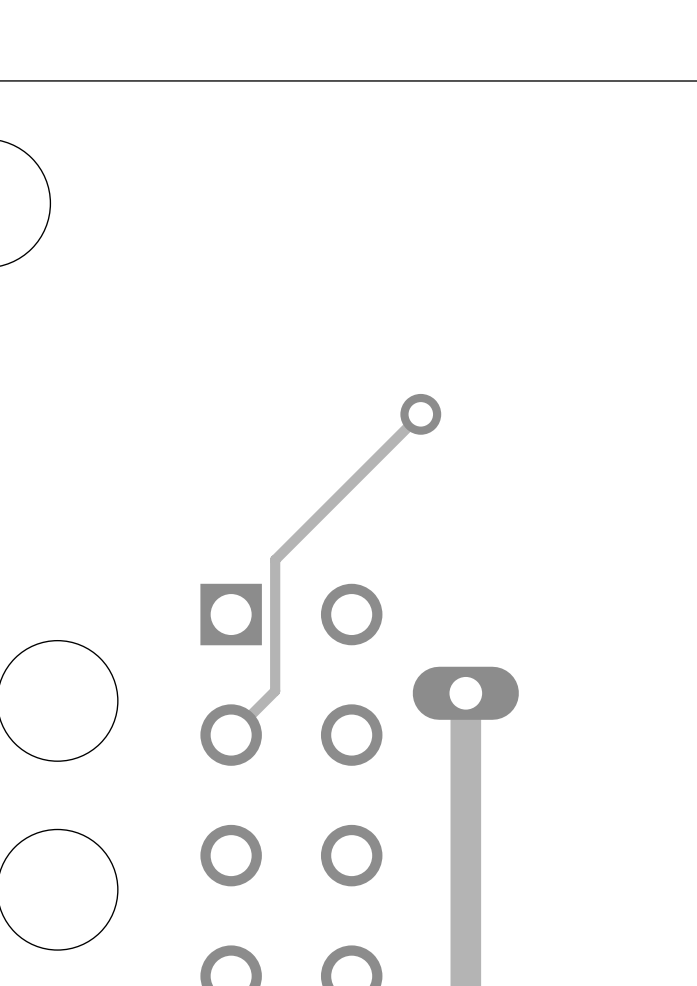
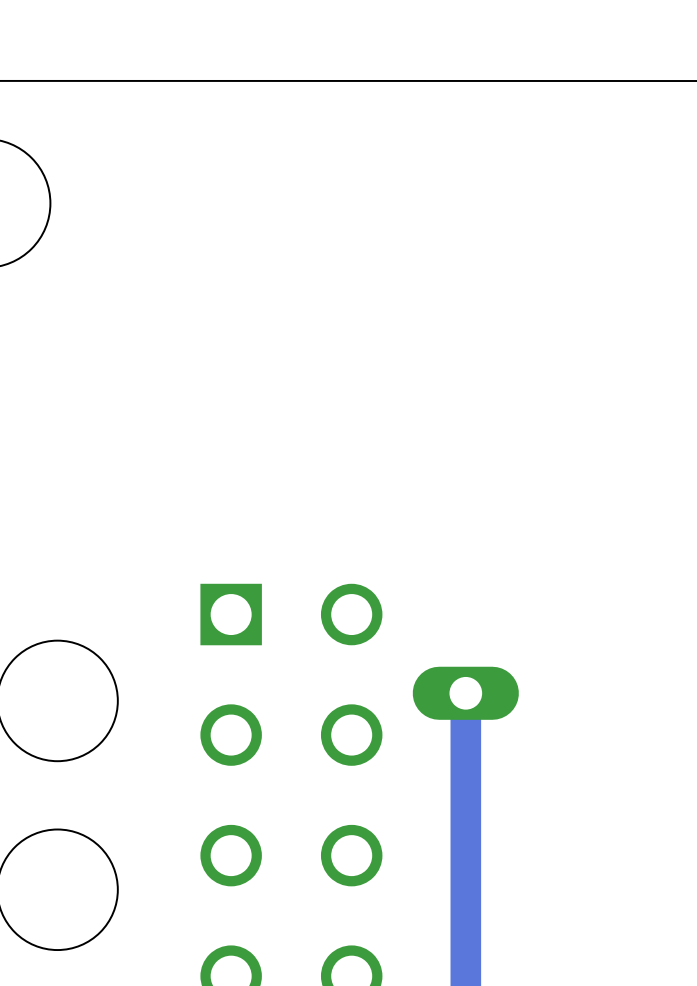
track: (420, 414) (275, 559) (275, 691) (231, 735) -> none
via: (420, 414) -> none

